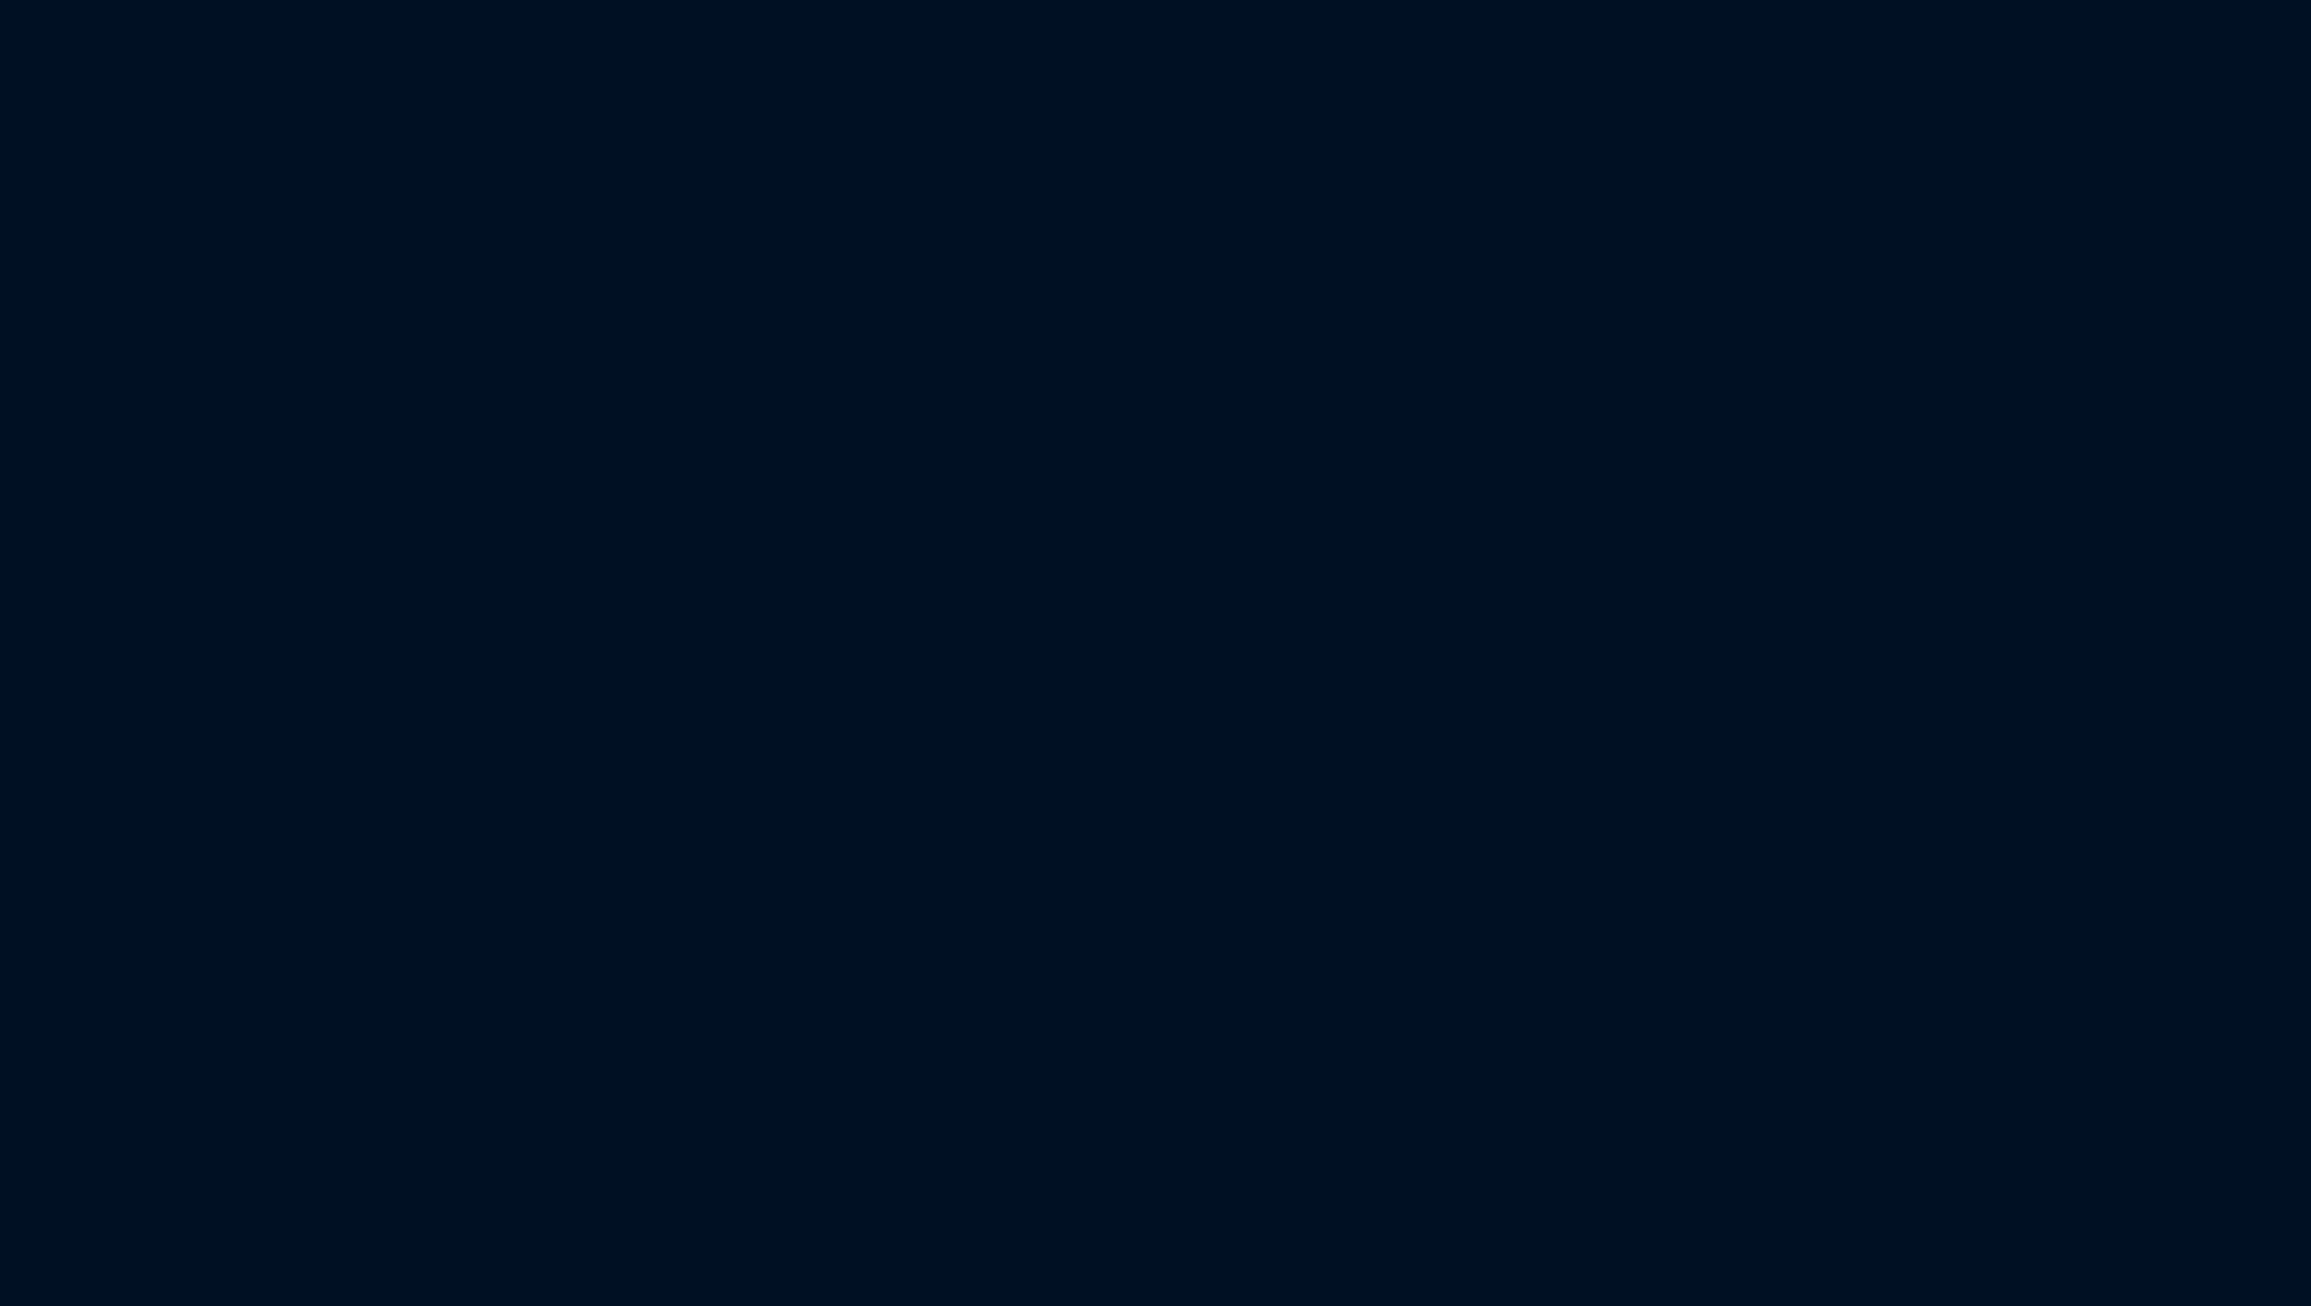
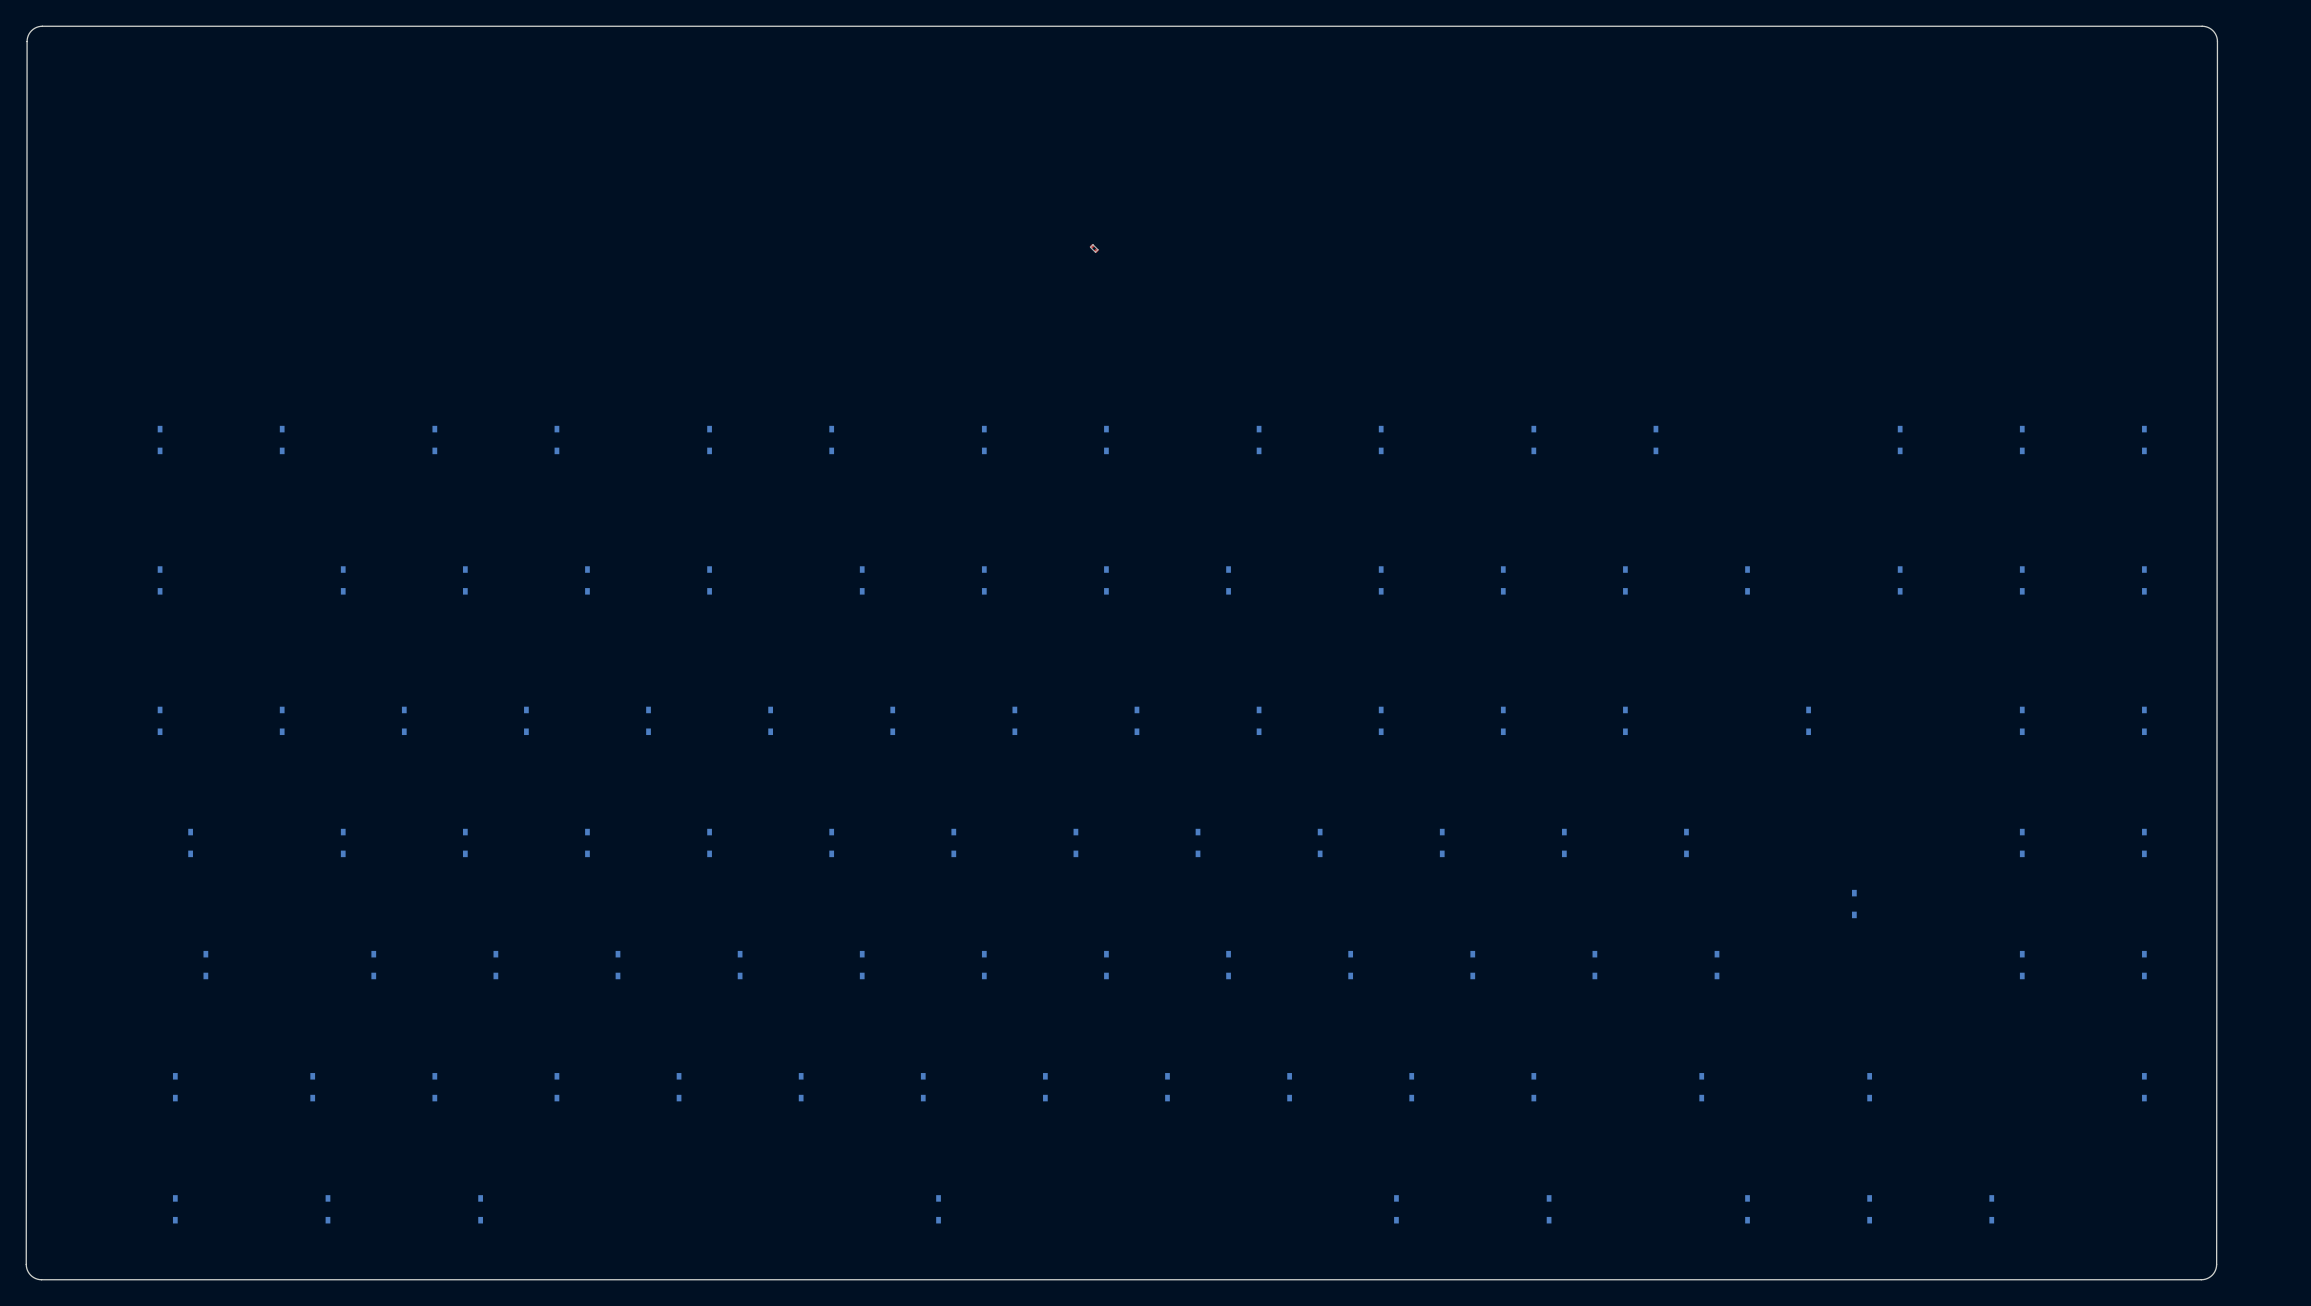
board edge: none -> (42, 26) (2202, 26) (2209, 28) (2215, 33) (2217, 41) (2216, 1264) (2214, 1272) (2209, 1277) (2201, 1279) (41, 1279) (33, 1277) (28, 1272) (26, 1264) (27, 41) (31, 30) (42, 26)
part: none -> (1094, 248)
part: none -> (160, 440)
part: none -> (282, 440)
part: none -> (434, 440)
part: none -> (556, 440)
part: none -> (709, 440)
part: none -> (831, 440)
part: none -> (984, 440)
part: none -> (1106, 440)
part: none -> (1259, 440)
part: none -> (1381, 440)
part: none -> (1533, 440)
part: none -> (1655, 440)
part: none -> (1900, 440)
part: none -> (2022, 440)
part: none -> (2144, 440)
part: none -> (160, 580)
part: none -> (343, 580)
part: none -> (465, 580)
part: none -> (587, 580)
part: none -> (709, 580)
part: none -> (862, 580)
part: none -> (984, 580)
part: none -> (1106, 580)
part: none -> (1228, 580)
part: none -> (1381, 580)
part: none -> (1503, 580)
part: none -> (1625, 580)
part: none -> (1747, 580)
part: none -> (1900, 580)
part: none -> (2022, 580)
part: none -> (2144, 580)
part: none -> (160, 720)
part: none -> (282, 720)
part: none -> (404, 720)
part: none -> (526, 720)
part: none -> (648, 720)
part: none -> (770, 720)
part: none -> (892, 720)
part: none -> (1014, 720)
part: none -> (1136, 720)
part: none -> (1259, 720)
part: none -> (1381, 720)
part: none -> (1503, 720)
part: none -> (1625, 720)
part: none -> (1808, 720)
part: none -> (2022, 720)
part: none -> (2144, 720)
part: none -> (190, 842)
part: none -> (343, 842)
part: none -> (465, 842)
part: none -> (587, 842)
part: none -> (709, 842)
part: none -> (831, 842)
part: none -> (953, 842)
part: none -> (1075, 842)
part: none -> (1198, 842)
part: none -> (1320, 842)
part: none -> (1442, 842)
part: none -> (1564, 842)
part: none -> (1686, 842)
part: none -> (2022, 842)
part: none -> (2144, 842)
part: none -> (1854, 904)
part: none -> (205, 965)
part: none -> (373, 965)
part: none -> (495, 965)
part: none -> (617, 965)
part: none -> (740, 965)
part: none -> (862, 965)
part: none -> (984, 965)
part: none -> (1106, 965)
part: none -> (1228, 965)
part: none -> (1350, 965)
part: none -> (1472, 965)
part: none -> (1594, 965)
part: none -> (1716, 965)
part: none -> (2022, 965)
part: none -> (2144, 965)
part: none -> (175, 1087)
part: none -> (312, 1087)
part: none -> (434, 1087)
part: none -> (556, 1087)
part: none -> (679, 1087)
part: none -> (801, 1087)
part: none -> (923, 1087)
part: none -> (1045, 1087)
part: none -> (1167, 1087)
part: none -> (1289, 1087)
part: none -> (1411, 1087)
part: none -> (1533, 1087)
part: none -> (1701, 1087)
part: none -> (1869, 1087)
part: none -> (2144, 1087)
part: none -> (175, 1209)
part: none -> (327, 1209)
part: none -> (480, 1209)
part: none -> (938, 1209)
part: none -> (1396, 1209)
part: none -> (1549, 1209)
part: none -> (1747, 1209)
part: none -> (1869, 1209)
part: none -> (1991, 1209)

